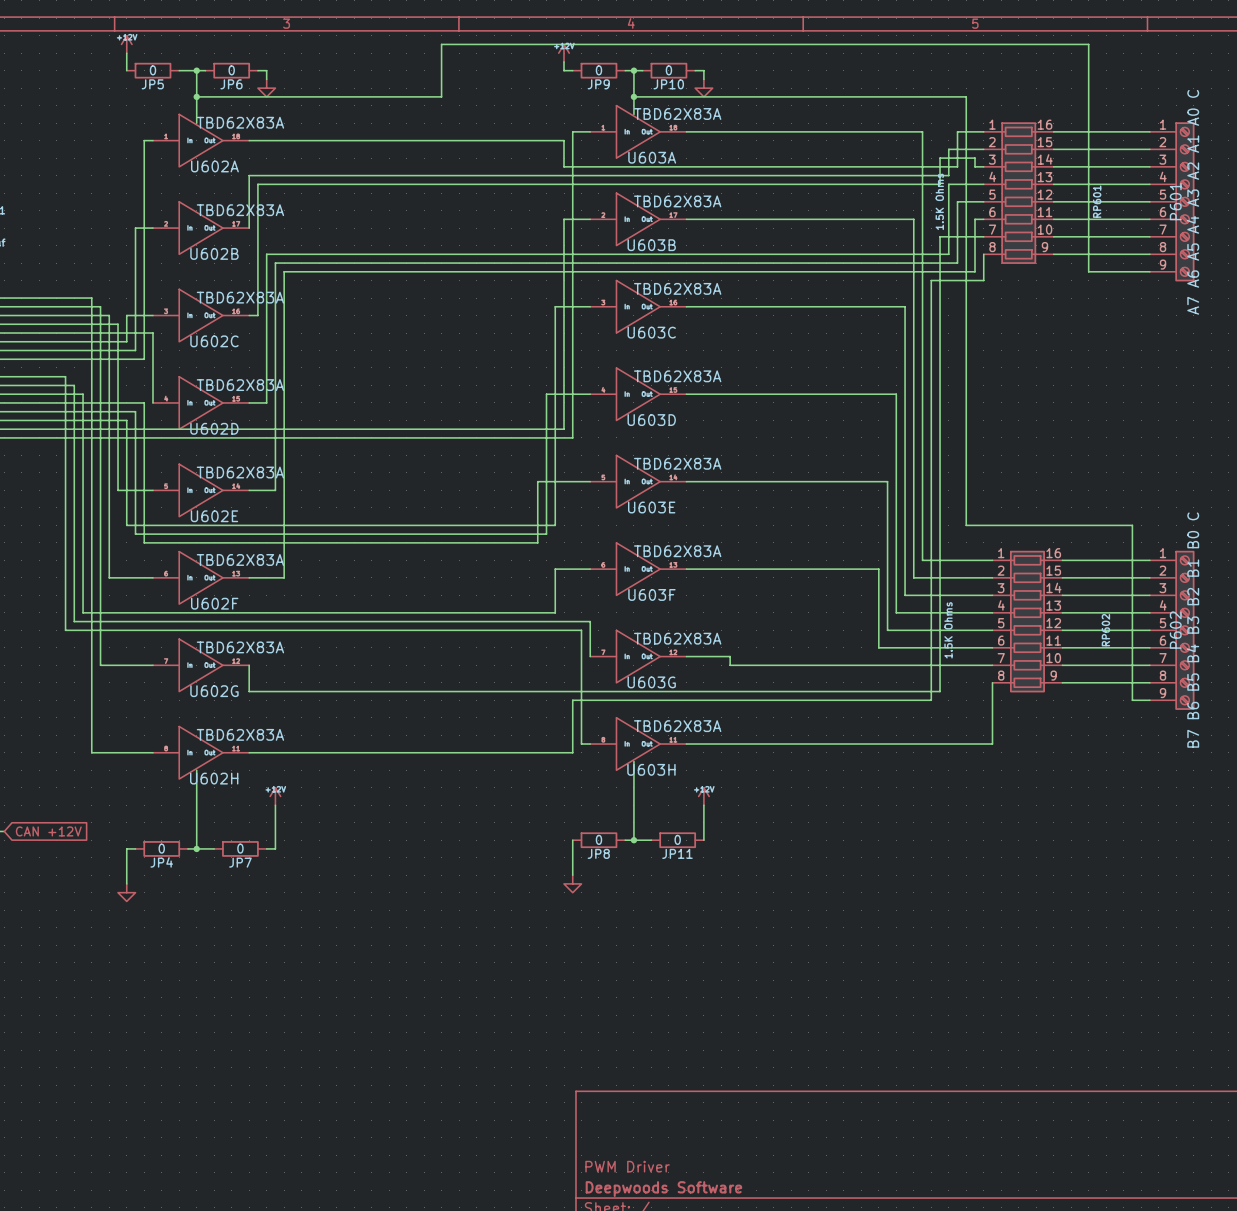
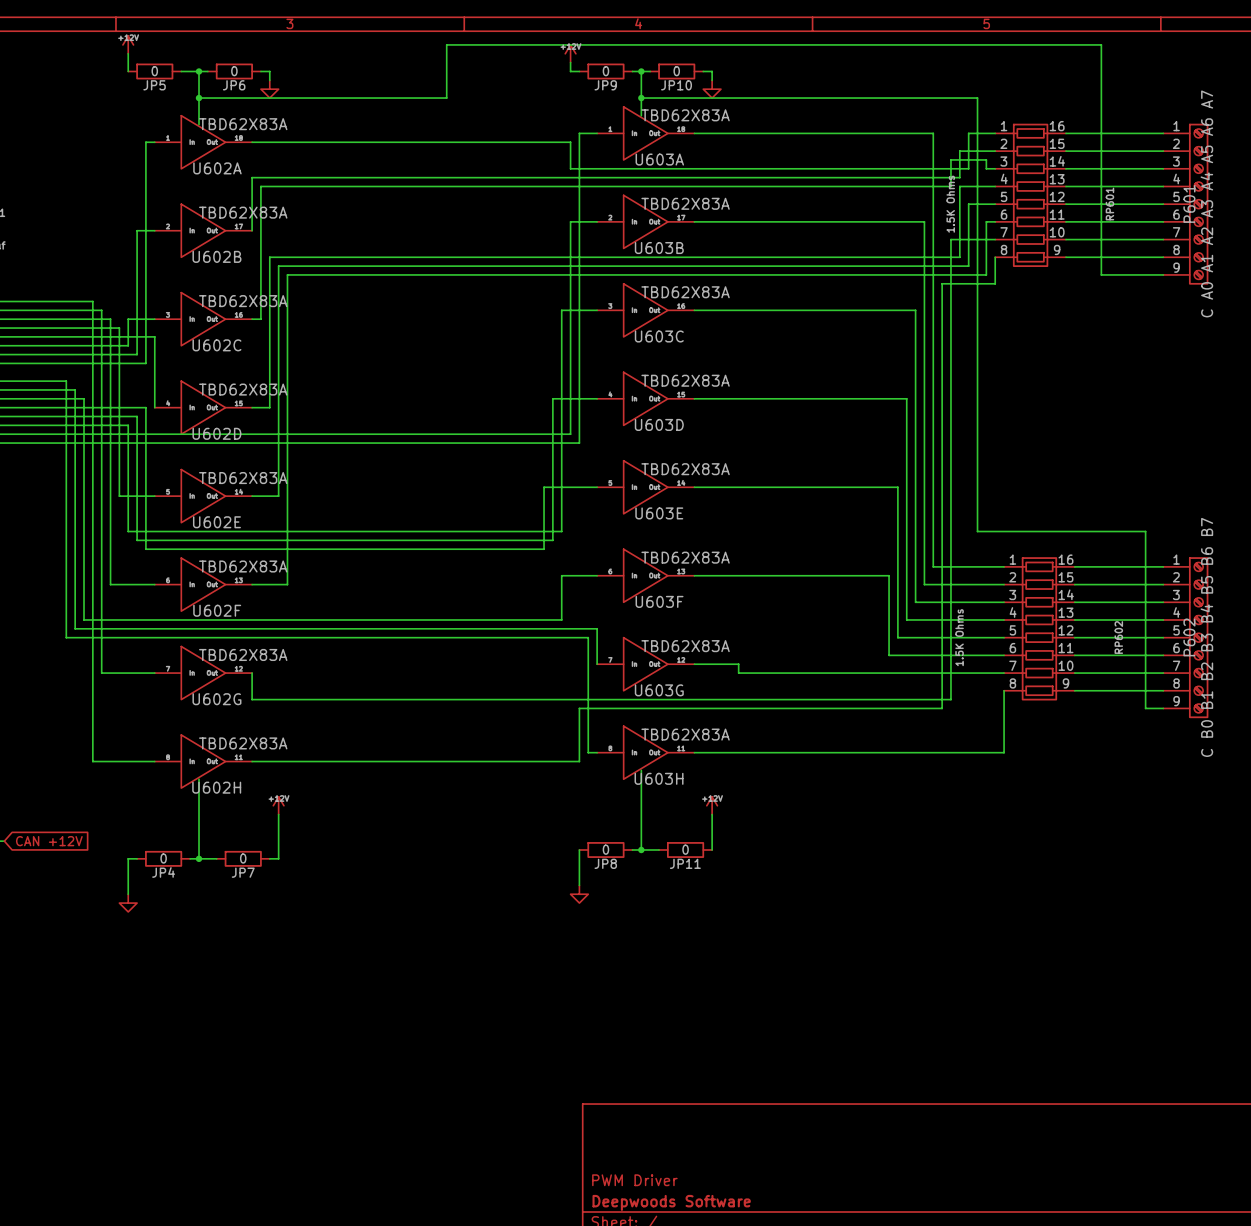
P601 value: A7 A6 A5 A4 A3 A2 A1 A0 C (1192, 202) -> C A0 A1 A2 A3 A4 A5 A6 A7 (1206, 203)
P602 value: B7 B6 B5 B4 B3 B2 B1 B0 C (1192, 630) -> C B0 B1 B2 B3 B4 B5 B6 B7 (1206, 637)

